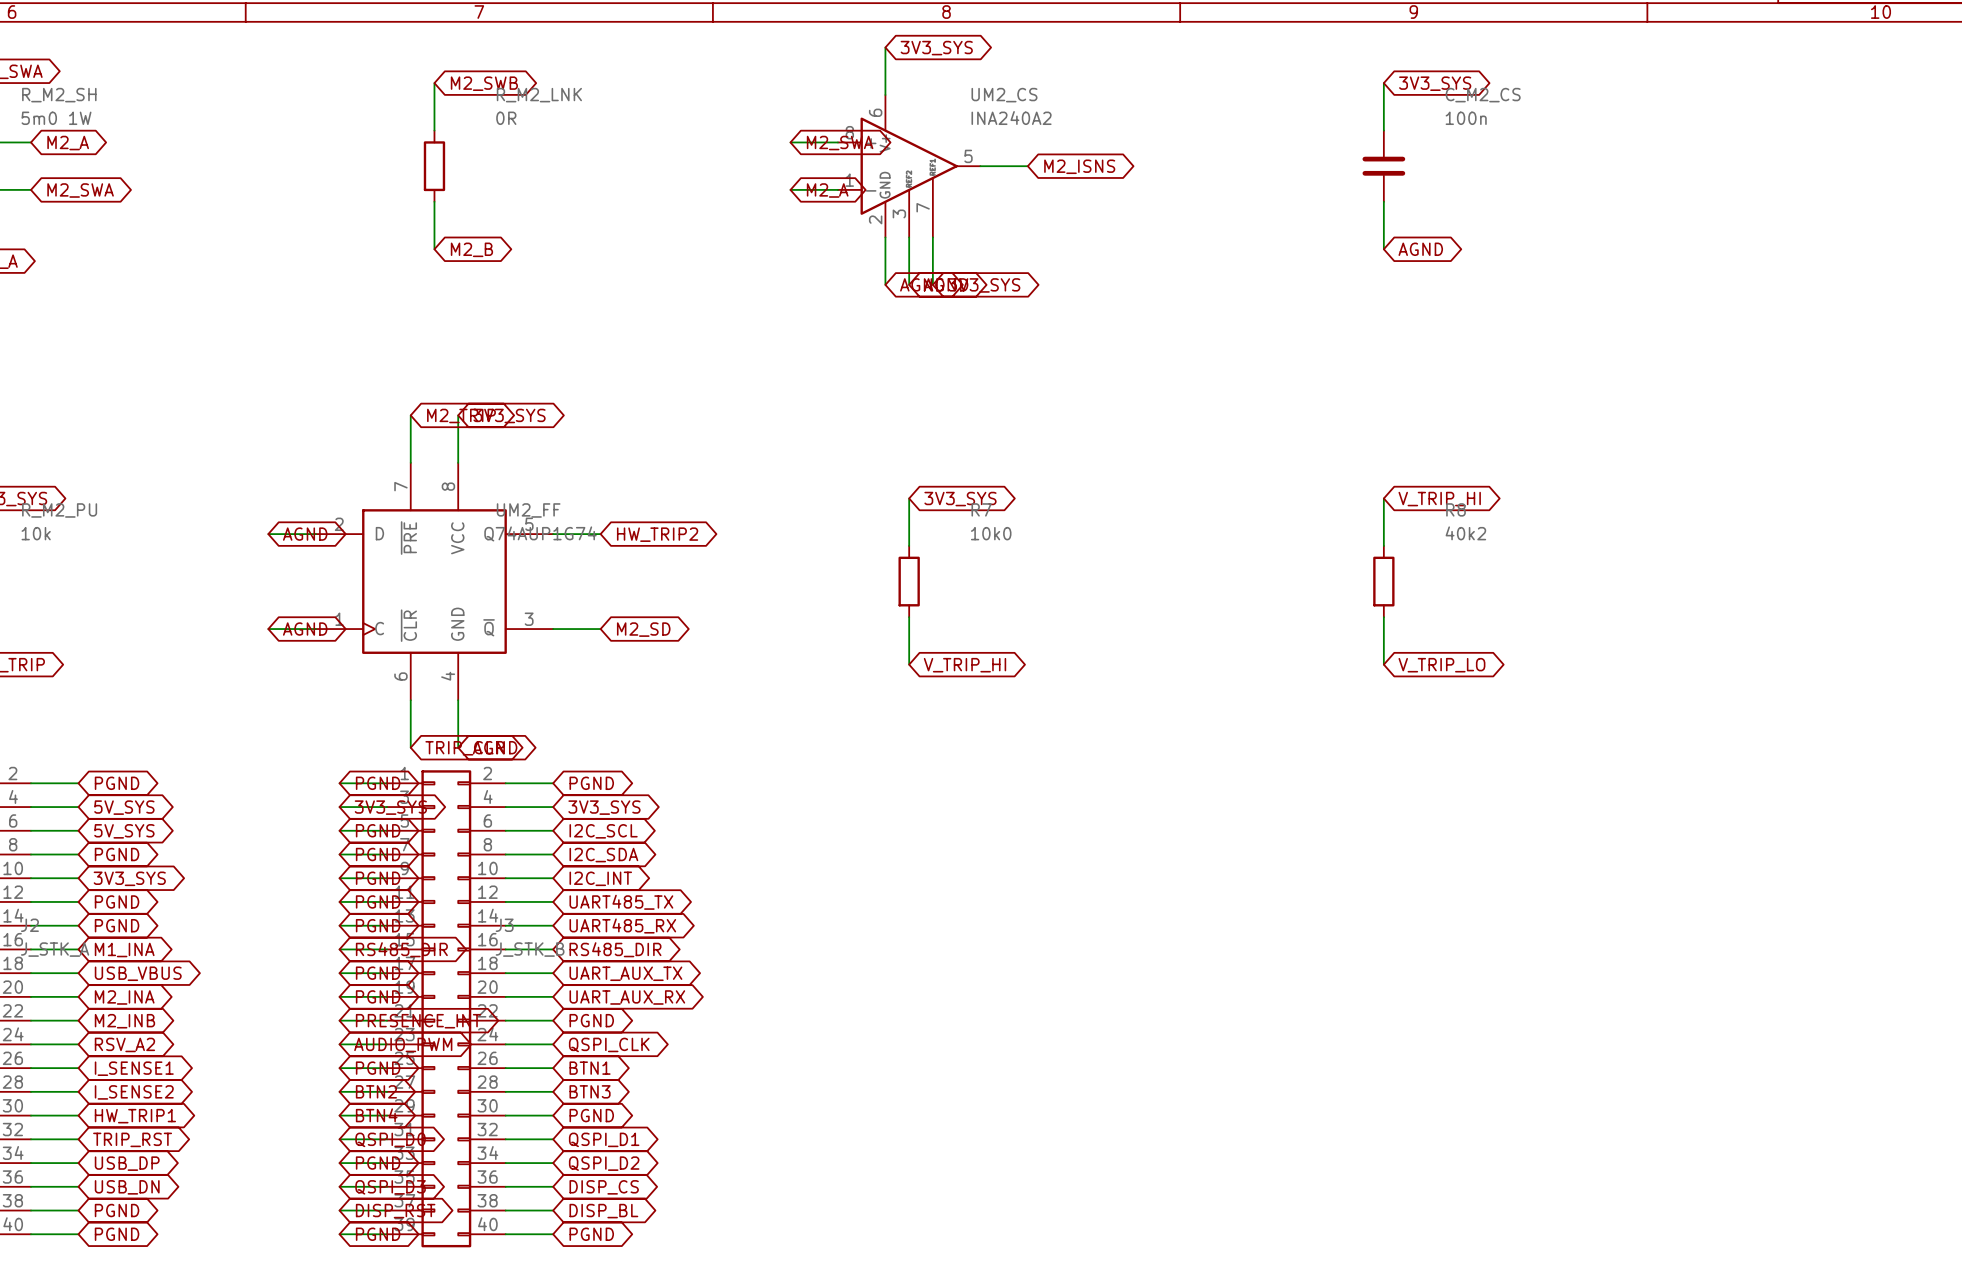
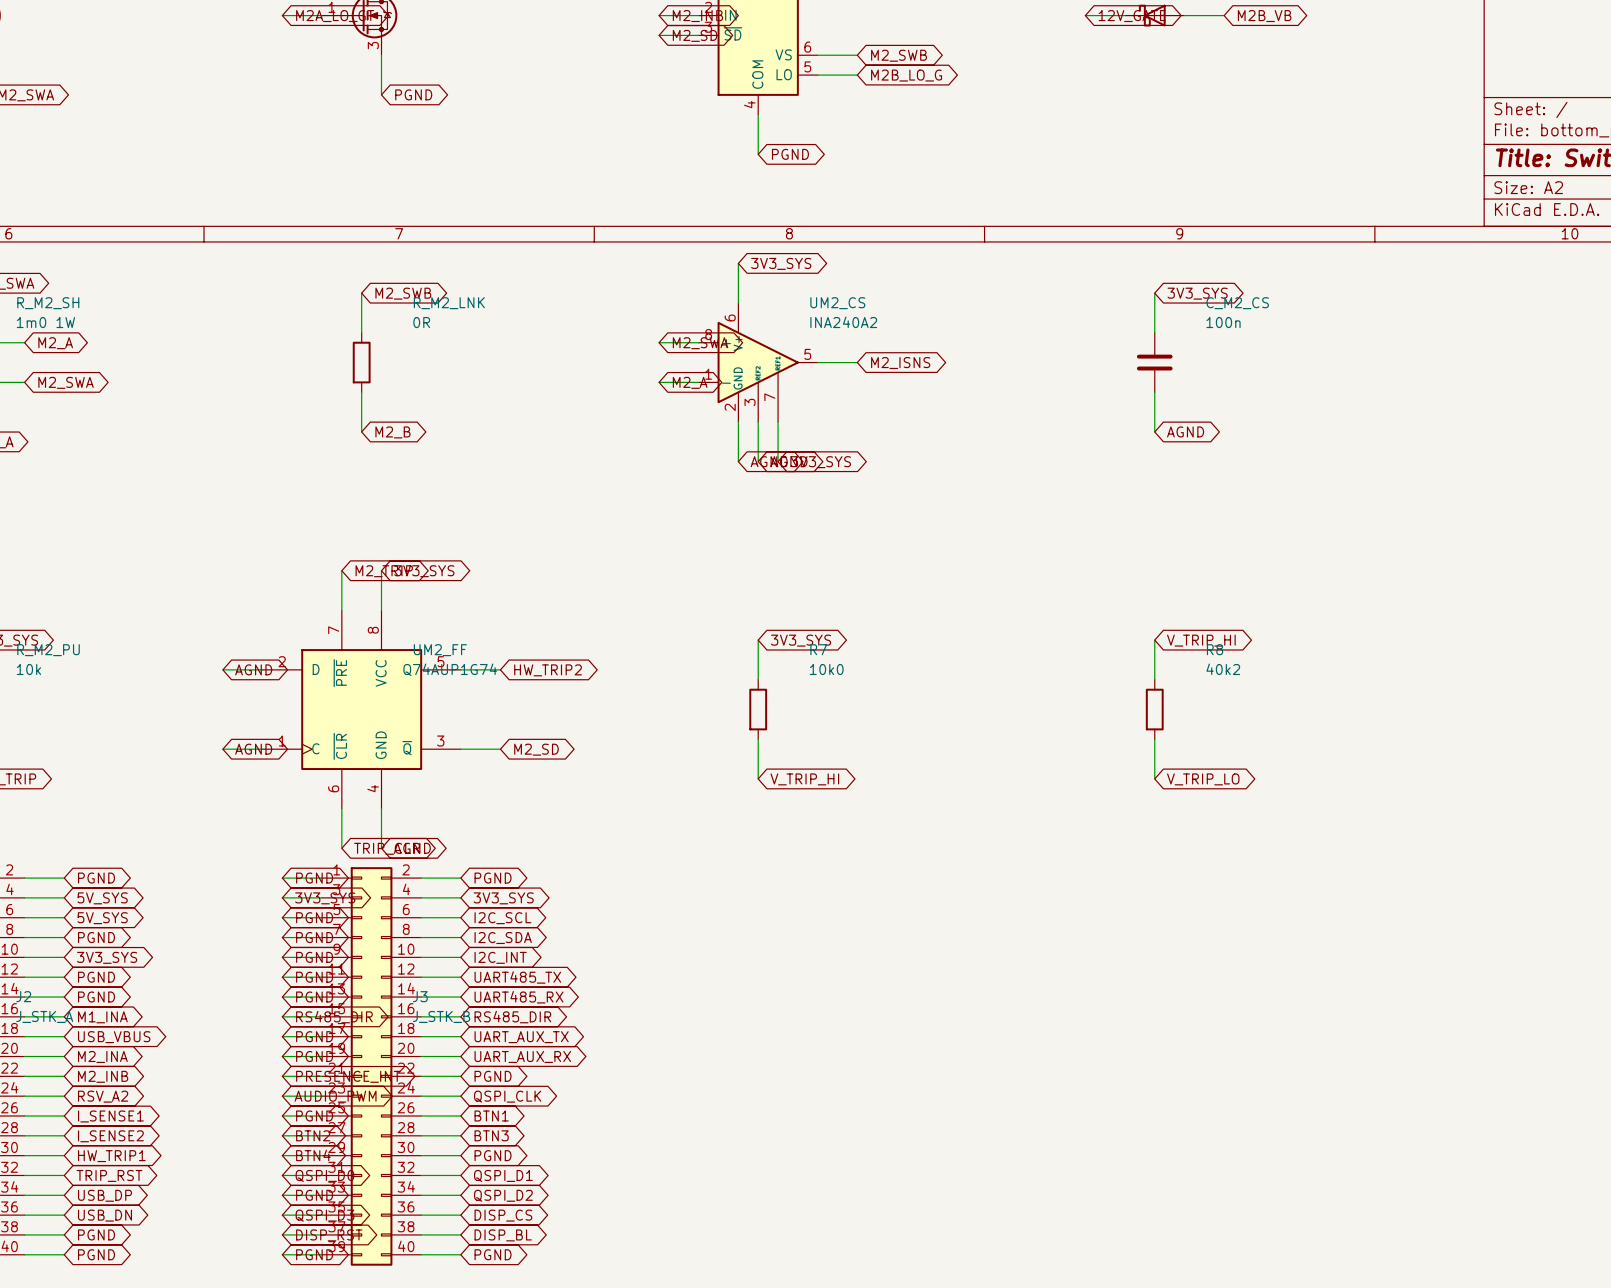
R_M2_SH value: 5m0 1W (56, 118) -> 1m0 1W (45, 322)

